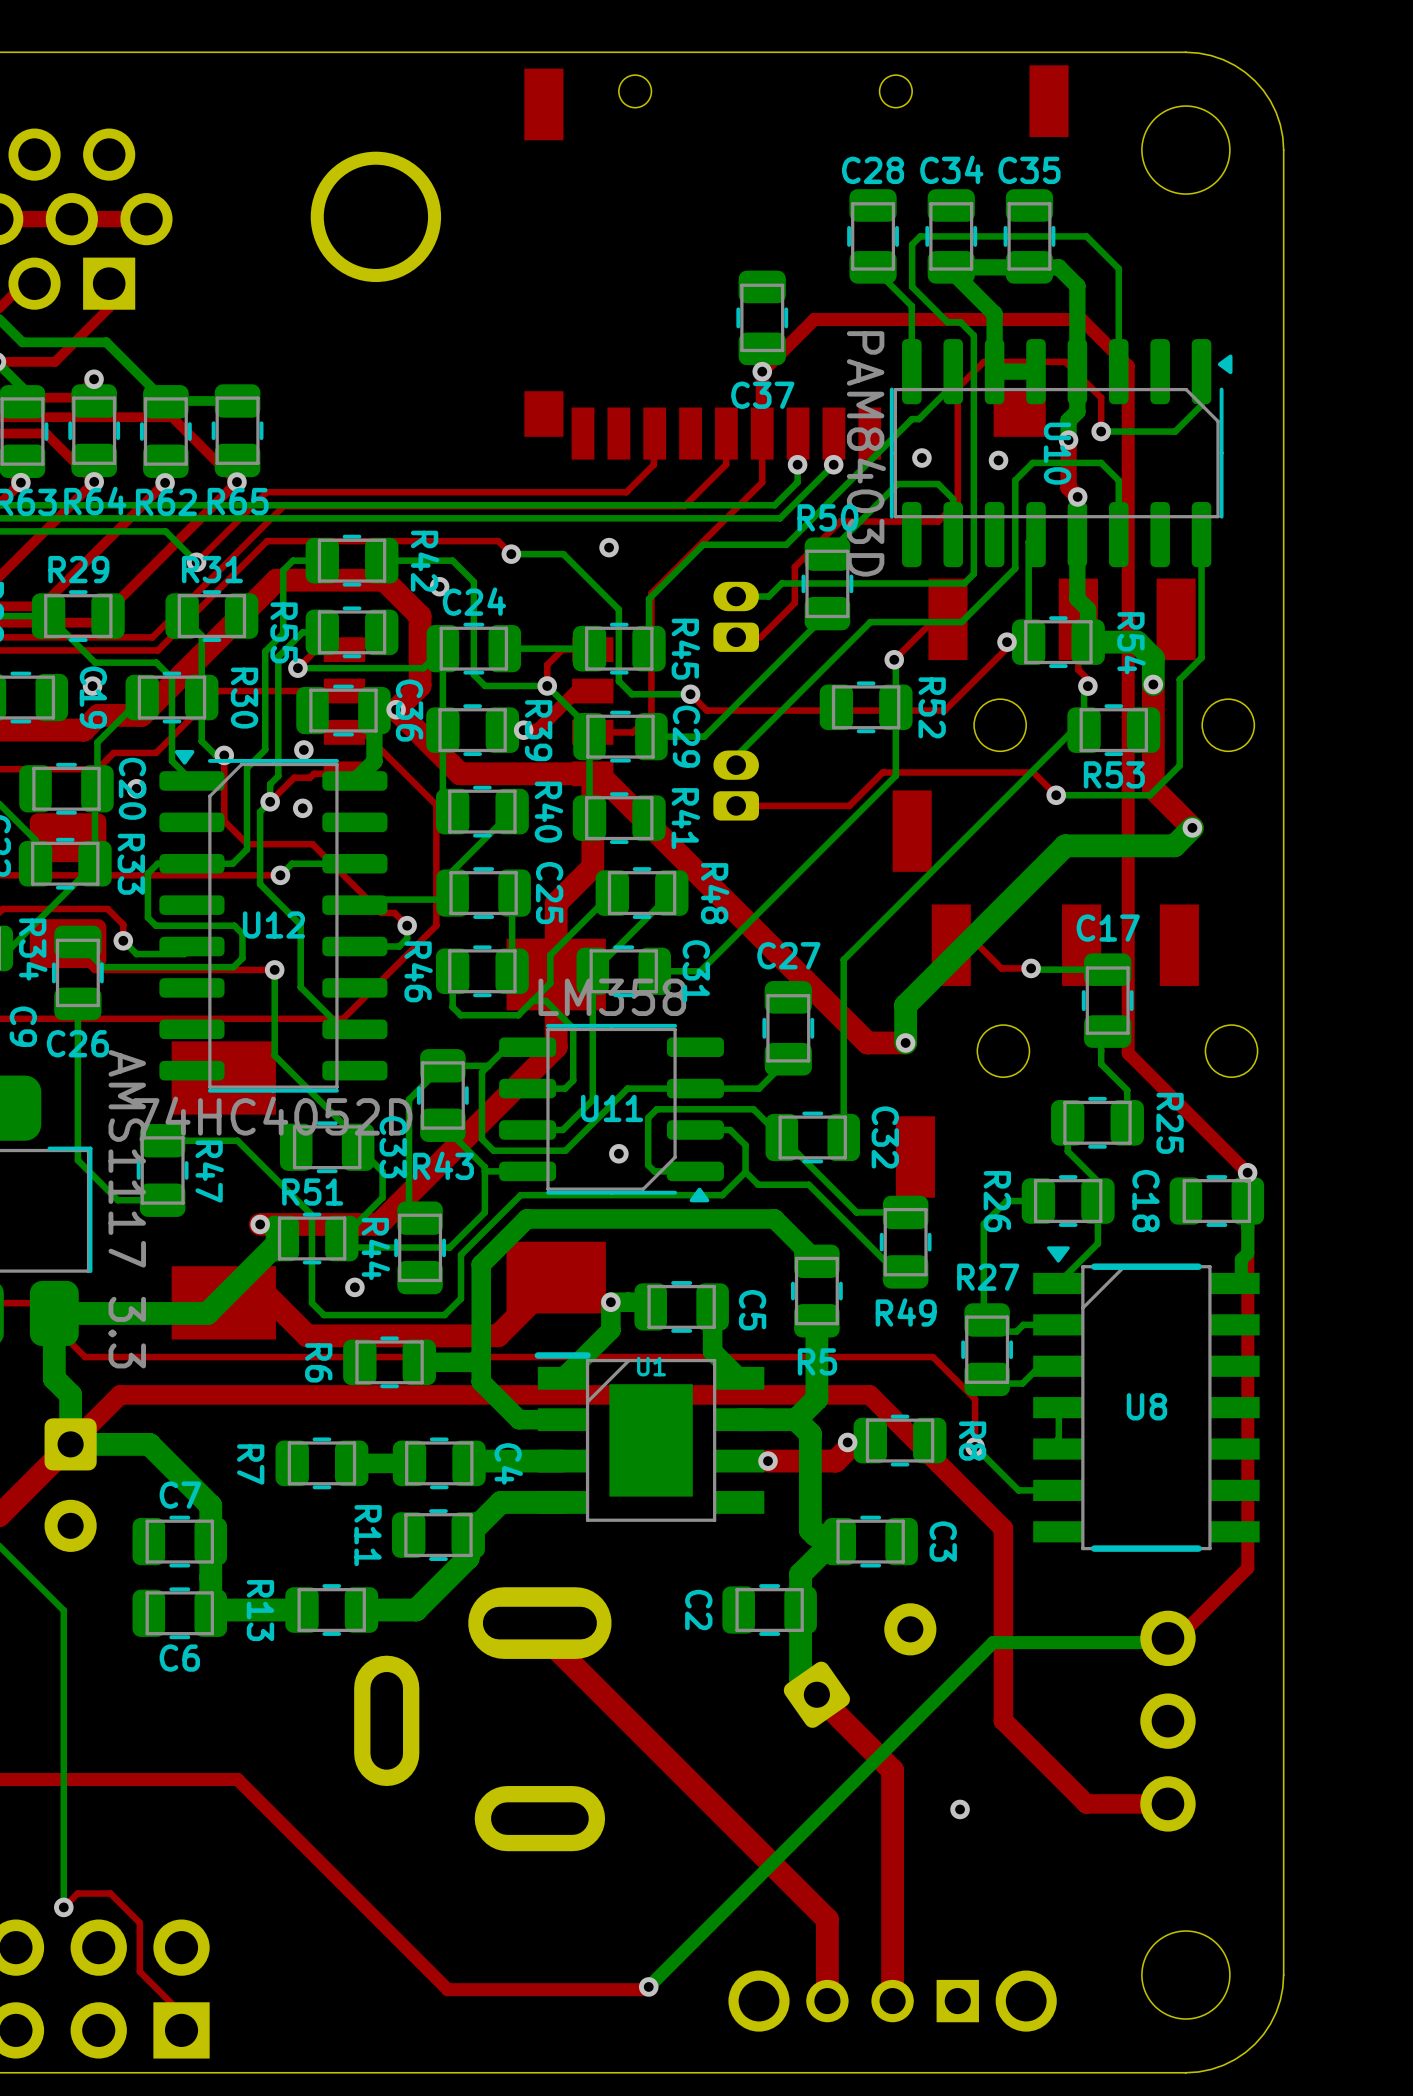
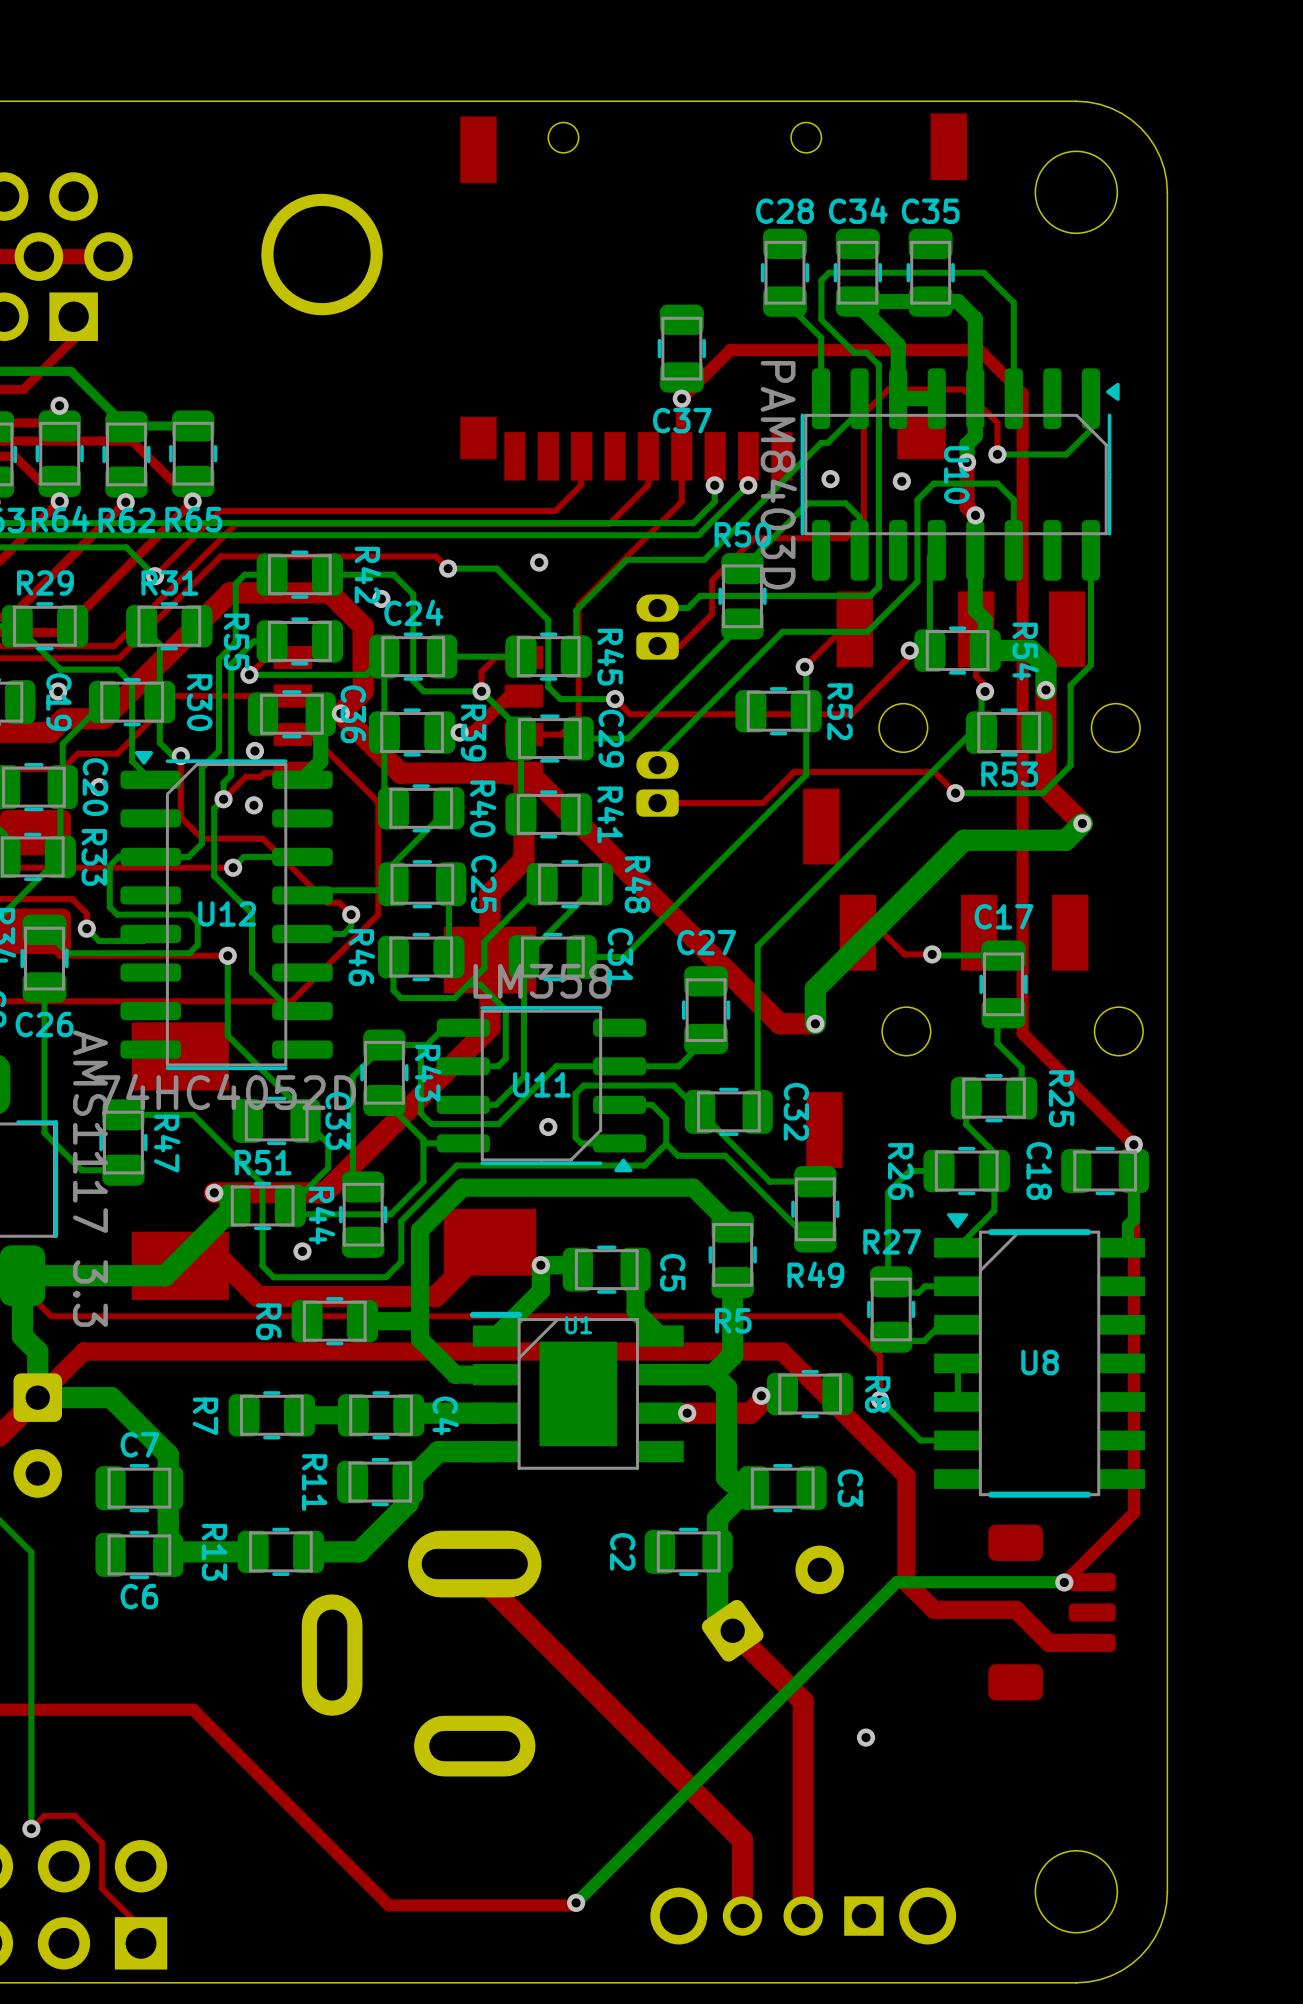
R43 name rotation: 0° (443, 1165) -> 90° clockwise (428, 1073)
R43 name position: R43 (443, 1165) -> R43 (428, 1073)
top track: (1003, 1642) (1003, 1720) (1086, 1803) (1167, 1803) -> (906, 1582) (934, 1609) (1015, 1609) (1049, 1642) (1092, 1642)
via: none -> (1064, 1582)
part: none -> (1052, 1612)
part: (1167, 1721) -> none

